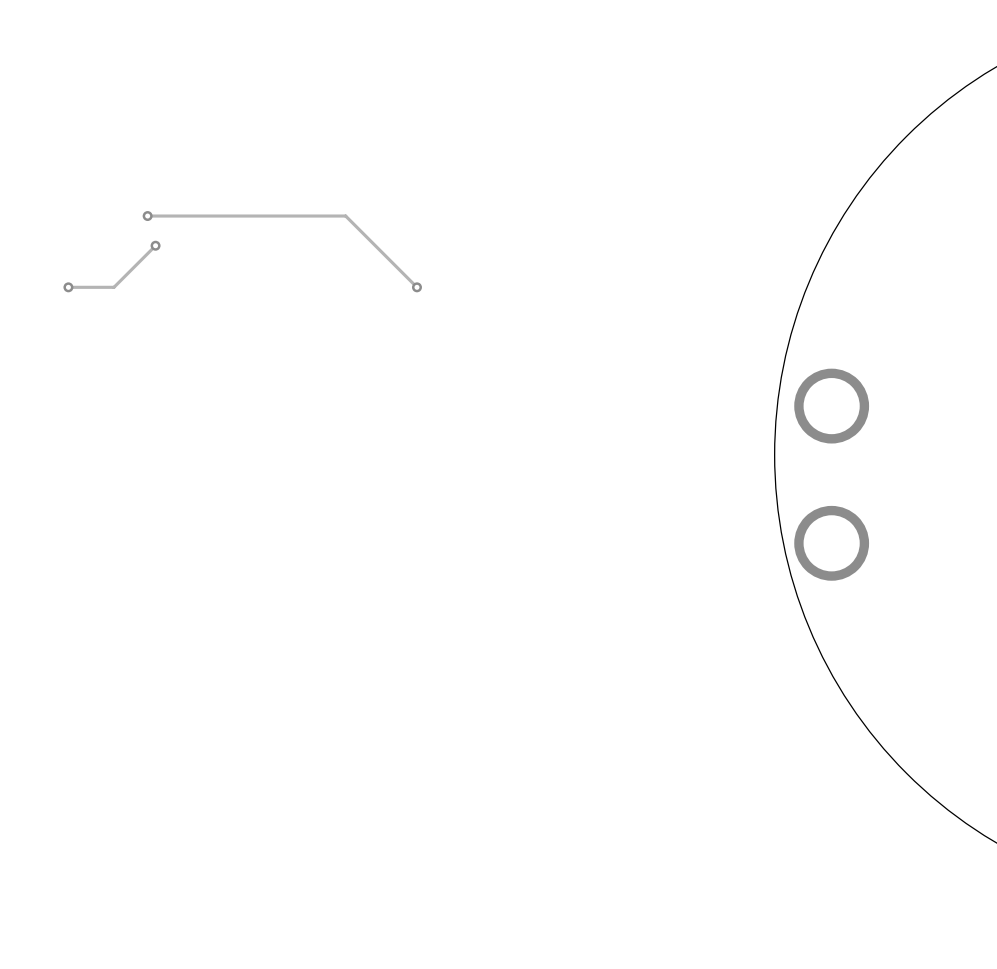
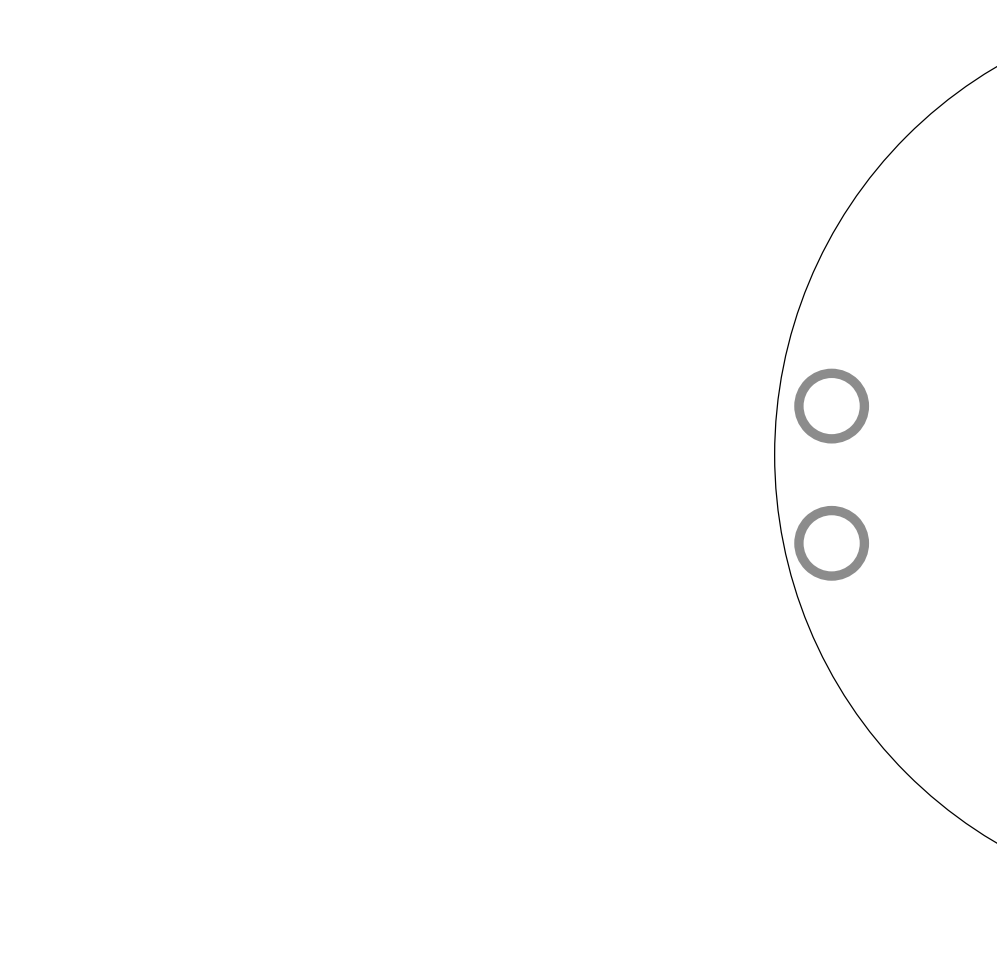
track: (147, 216) (345, 216) (416, 287) -> none
via: (147, 216) -> none
track: (155, 245) (113, 287) (68, 287) -> none
via: (155, 245) -> none
via: (68, 287) -> none
via: (416, 287) -> none

